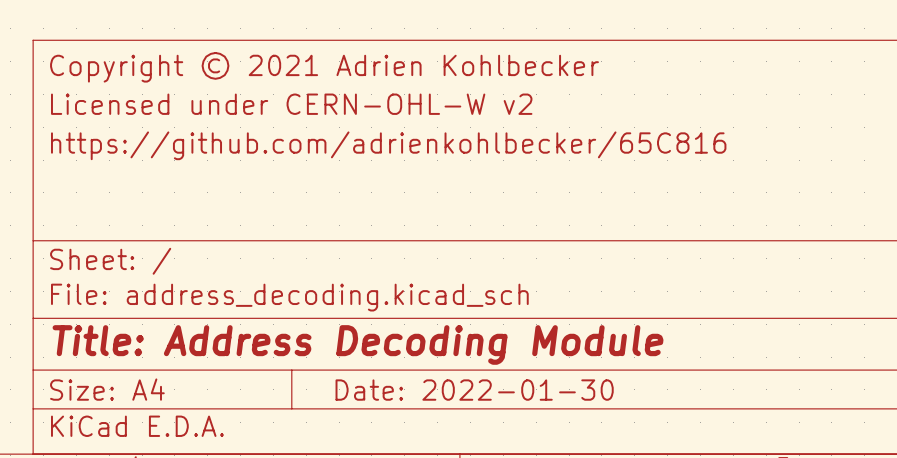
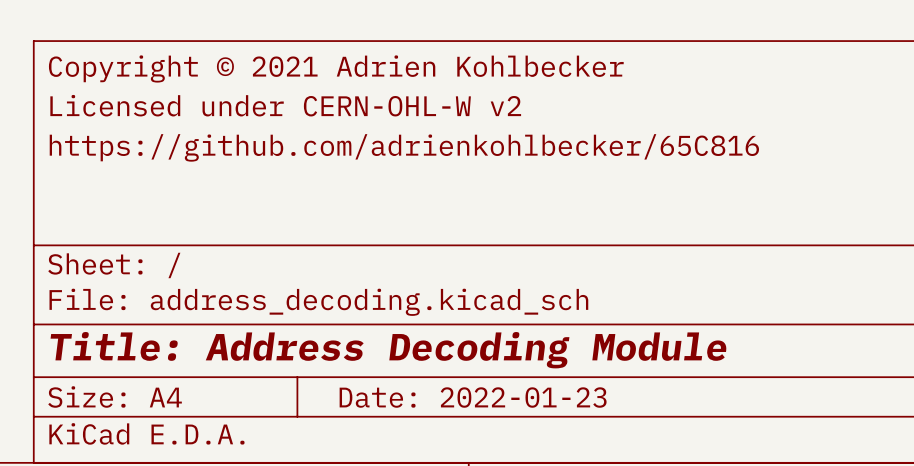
title block: Date: 2022-01-30 (474, 390) -> Date: 2022-01-23 (473, 397)

